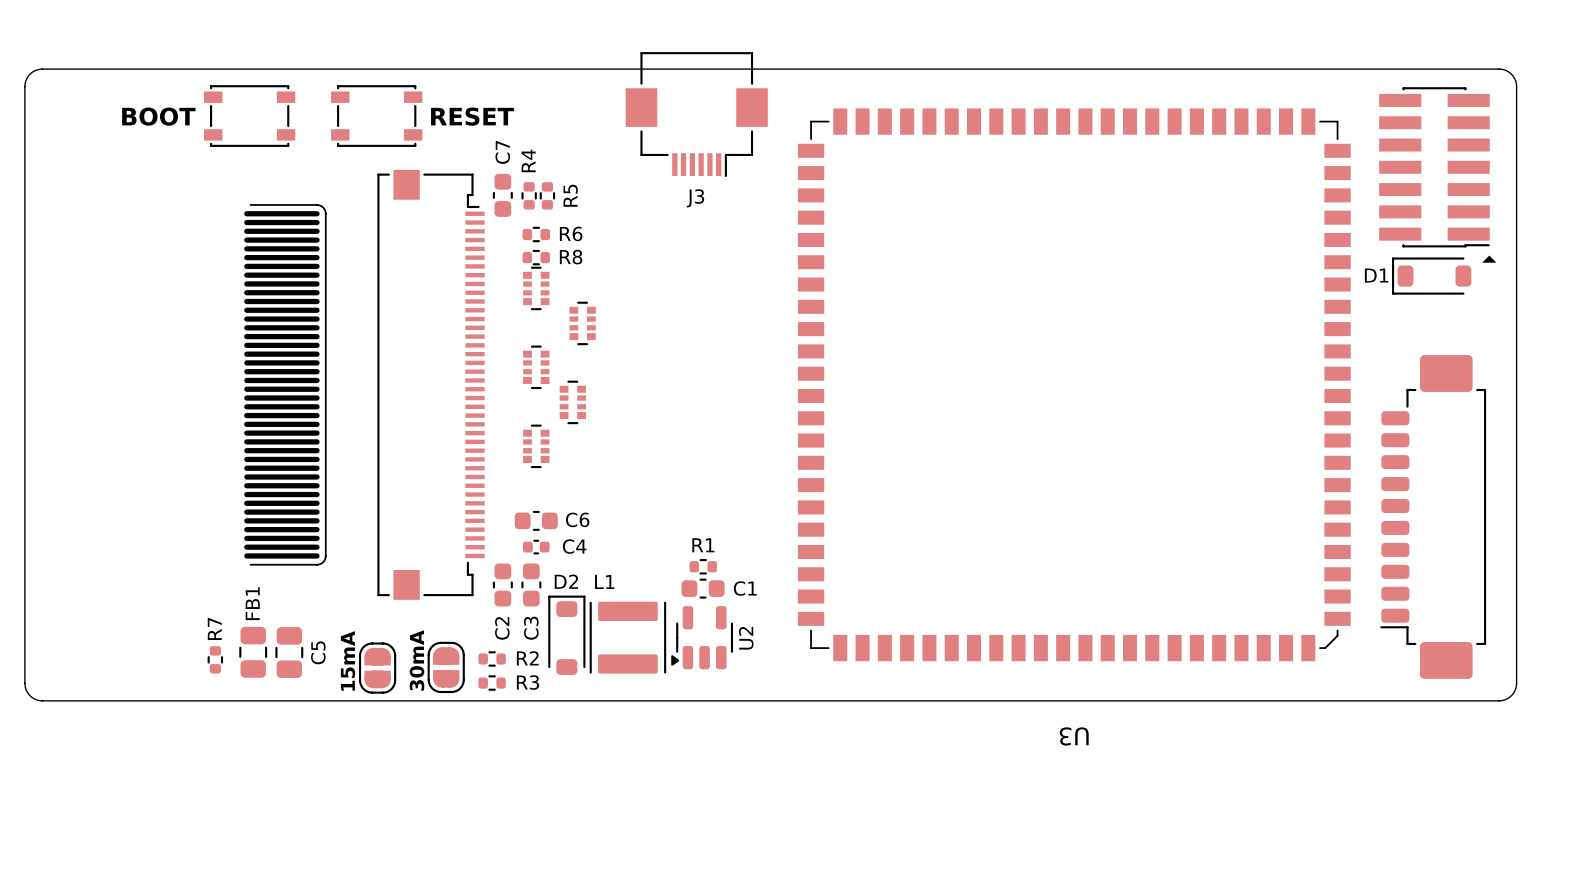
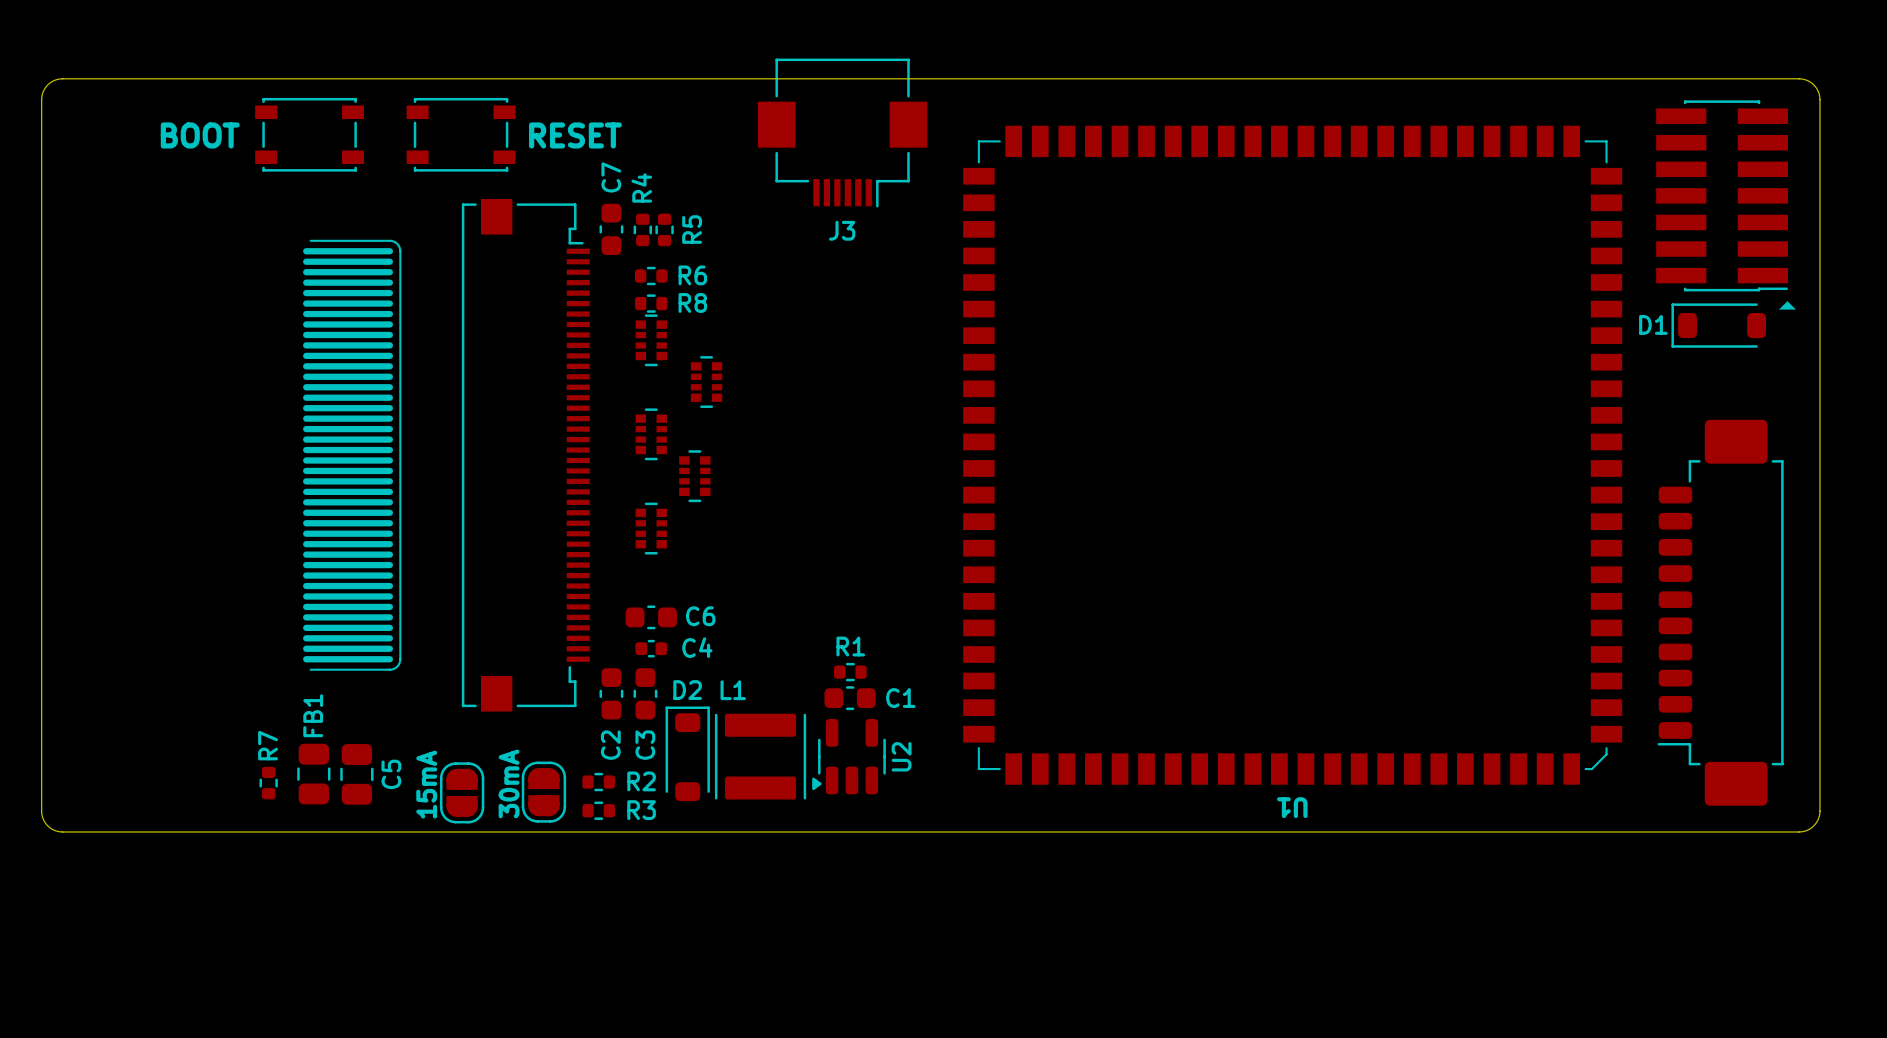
U3 name: U3 (1074, 736) -> U1 (1292, 807)

